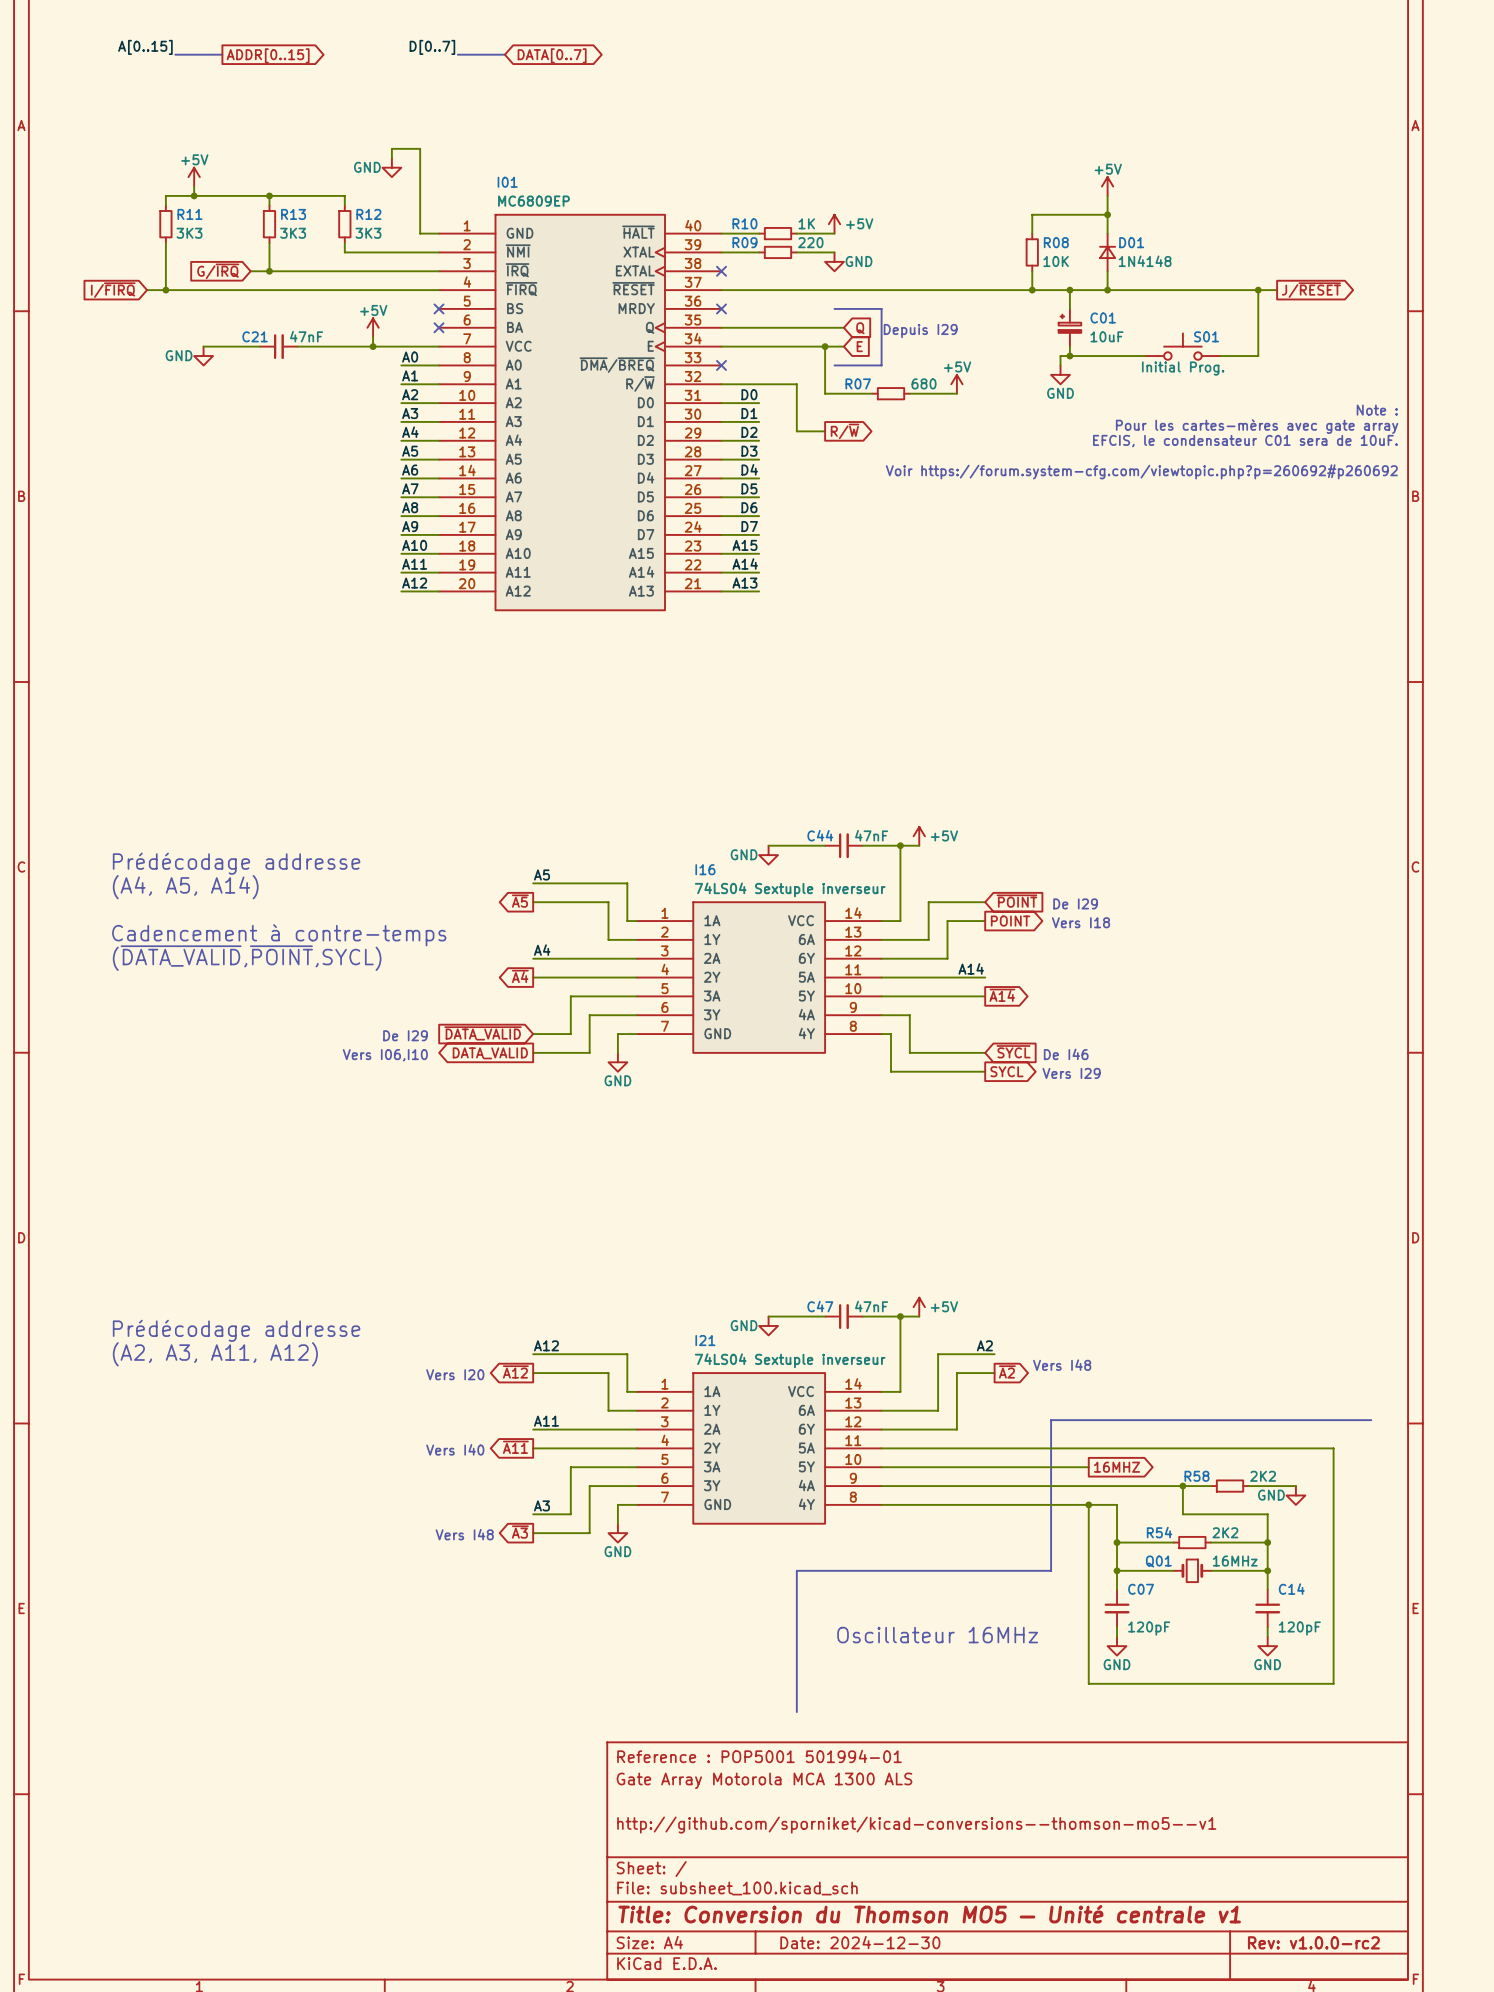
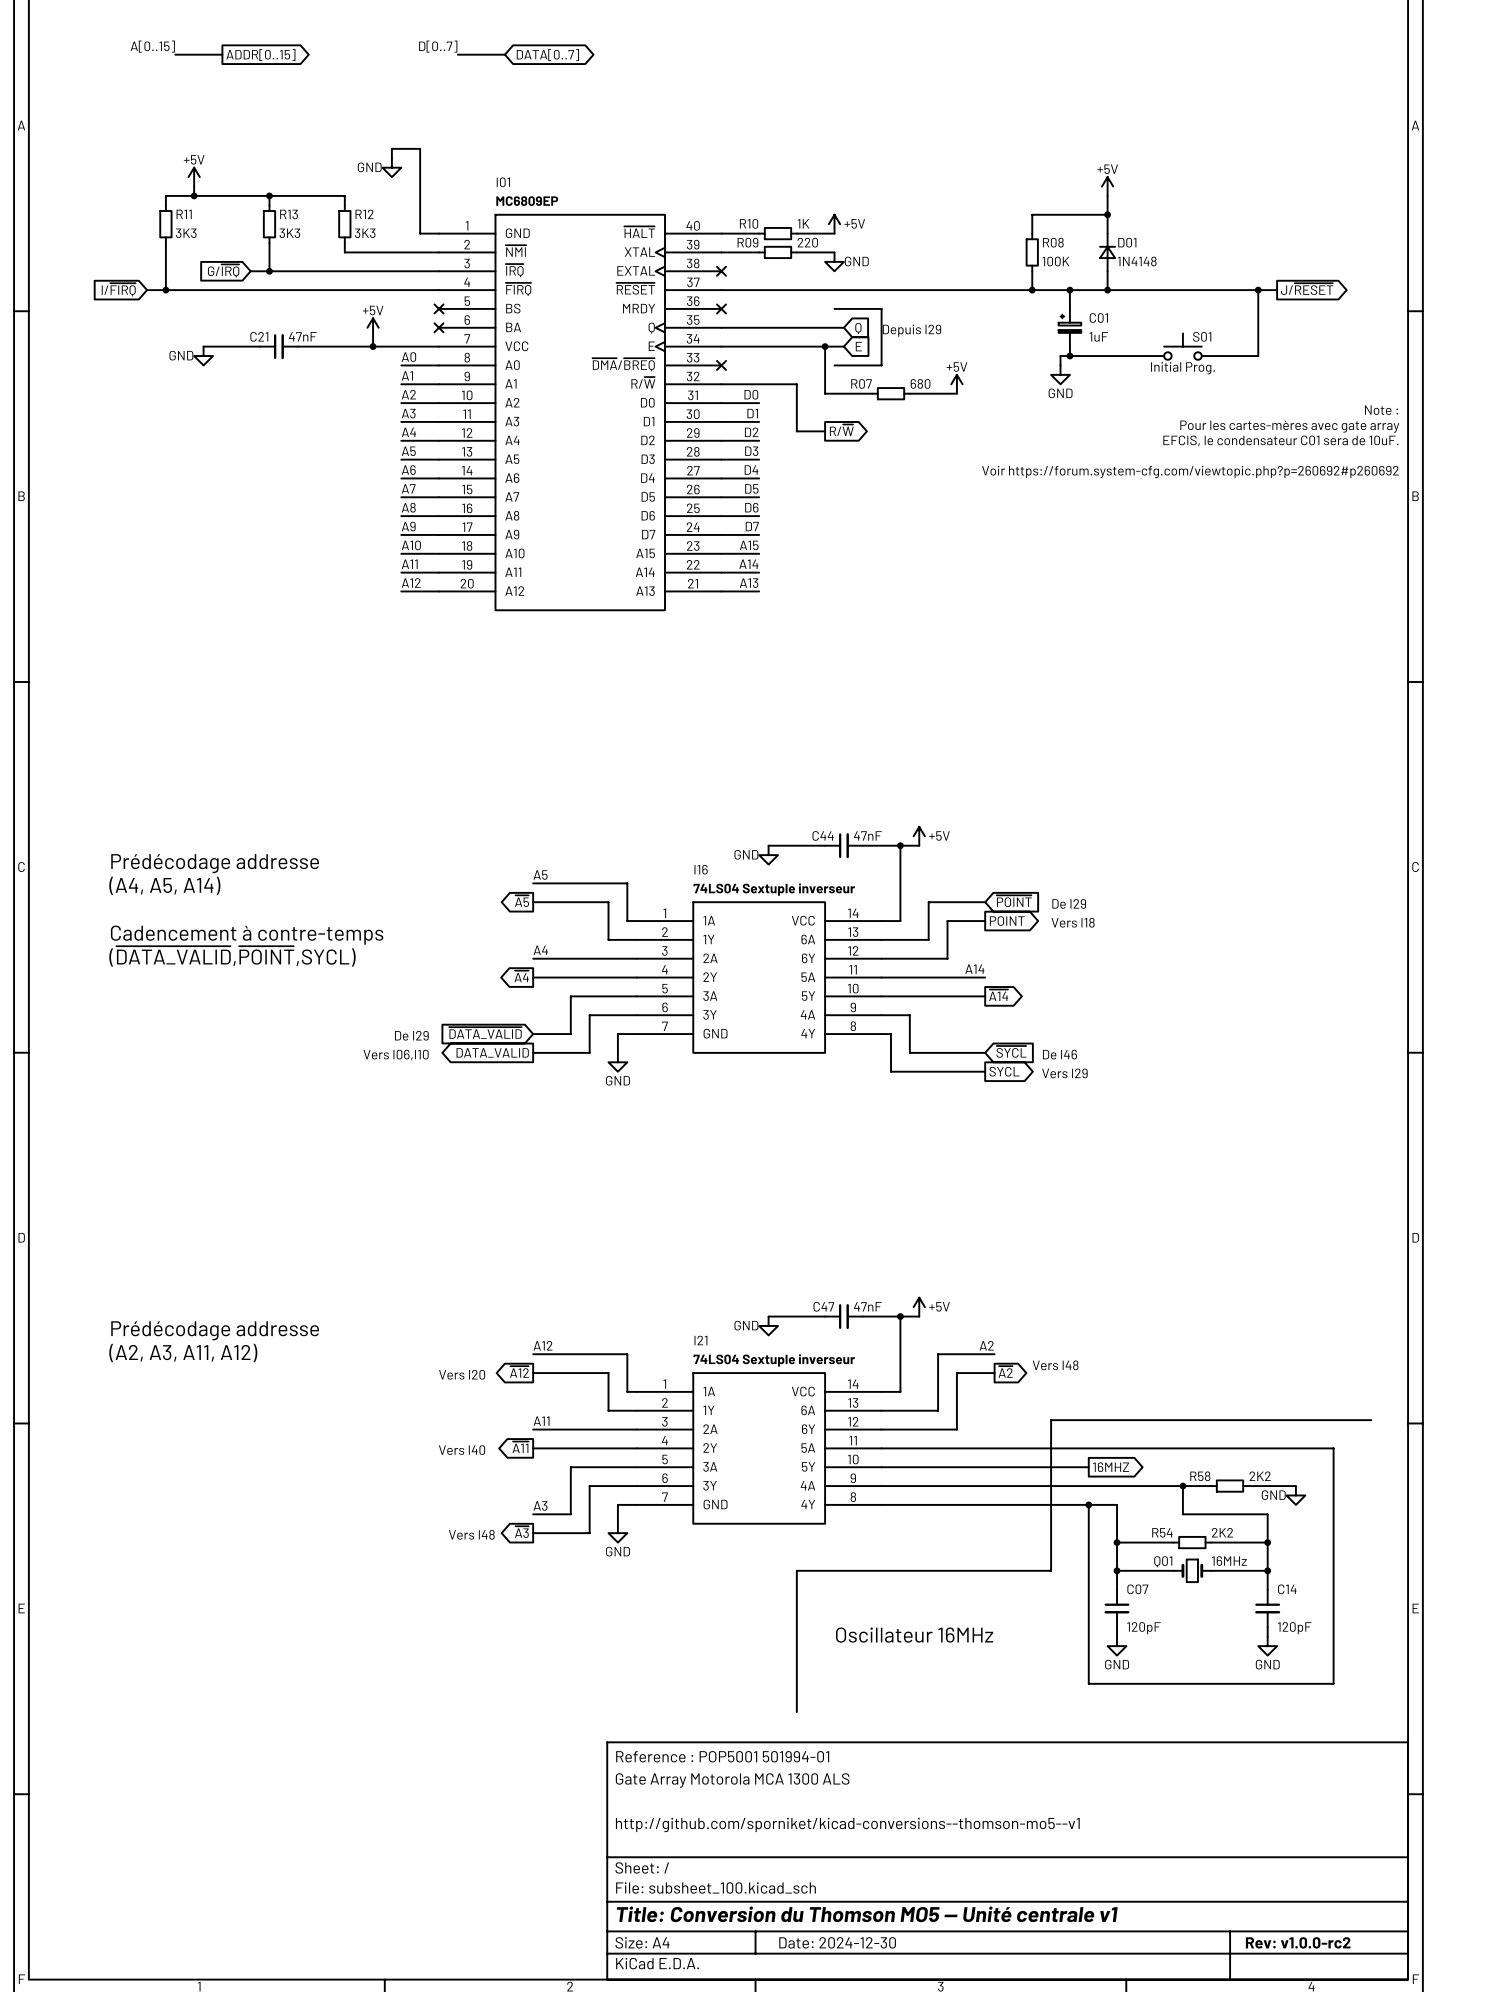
R08 value: 10K (1056, 261) -> 100K (1055, 261)
C01 value: 10uF (1106, 336) -> 1uF (1098, 336)

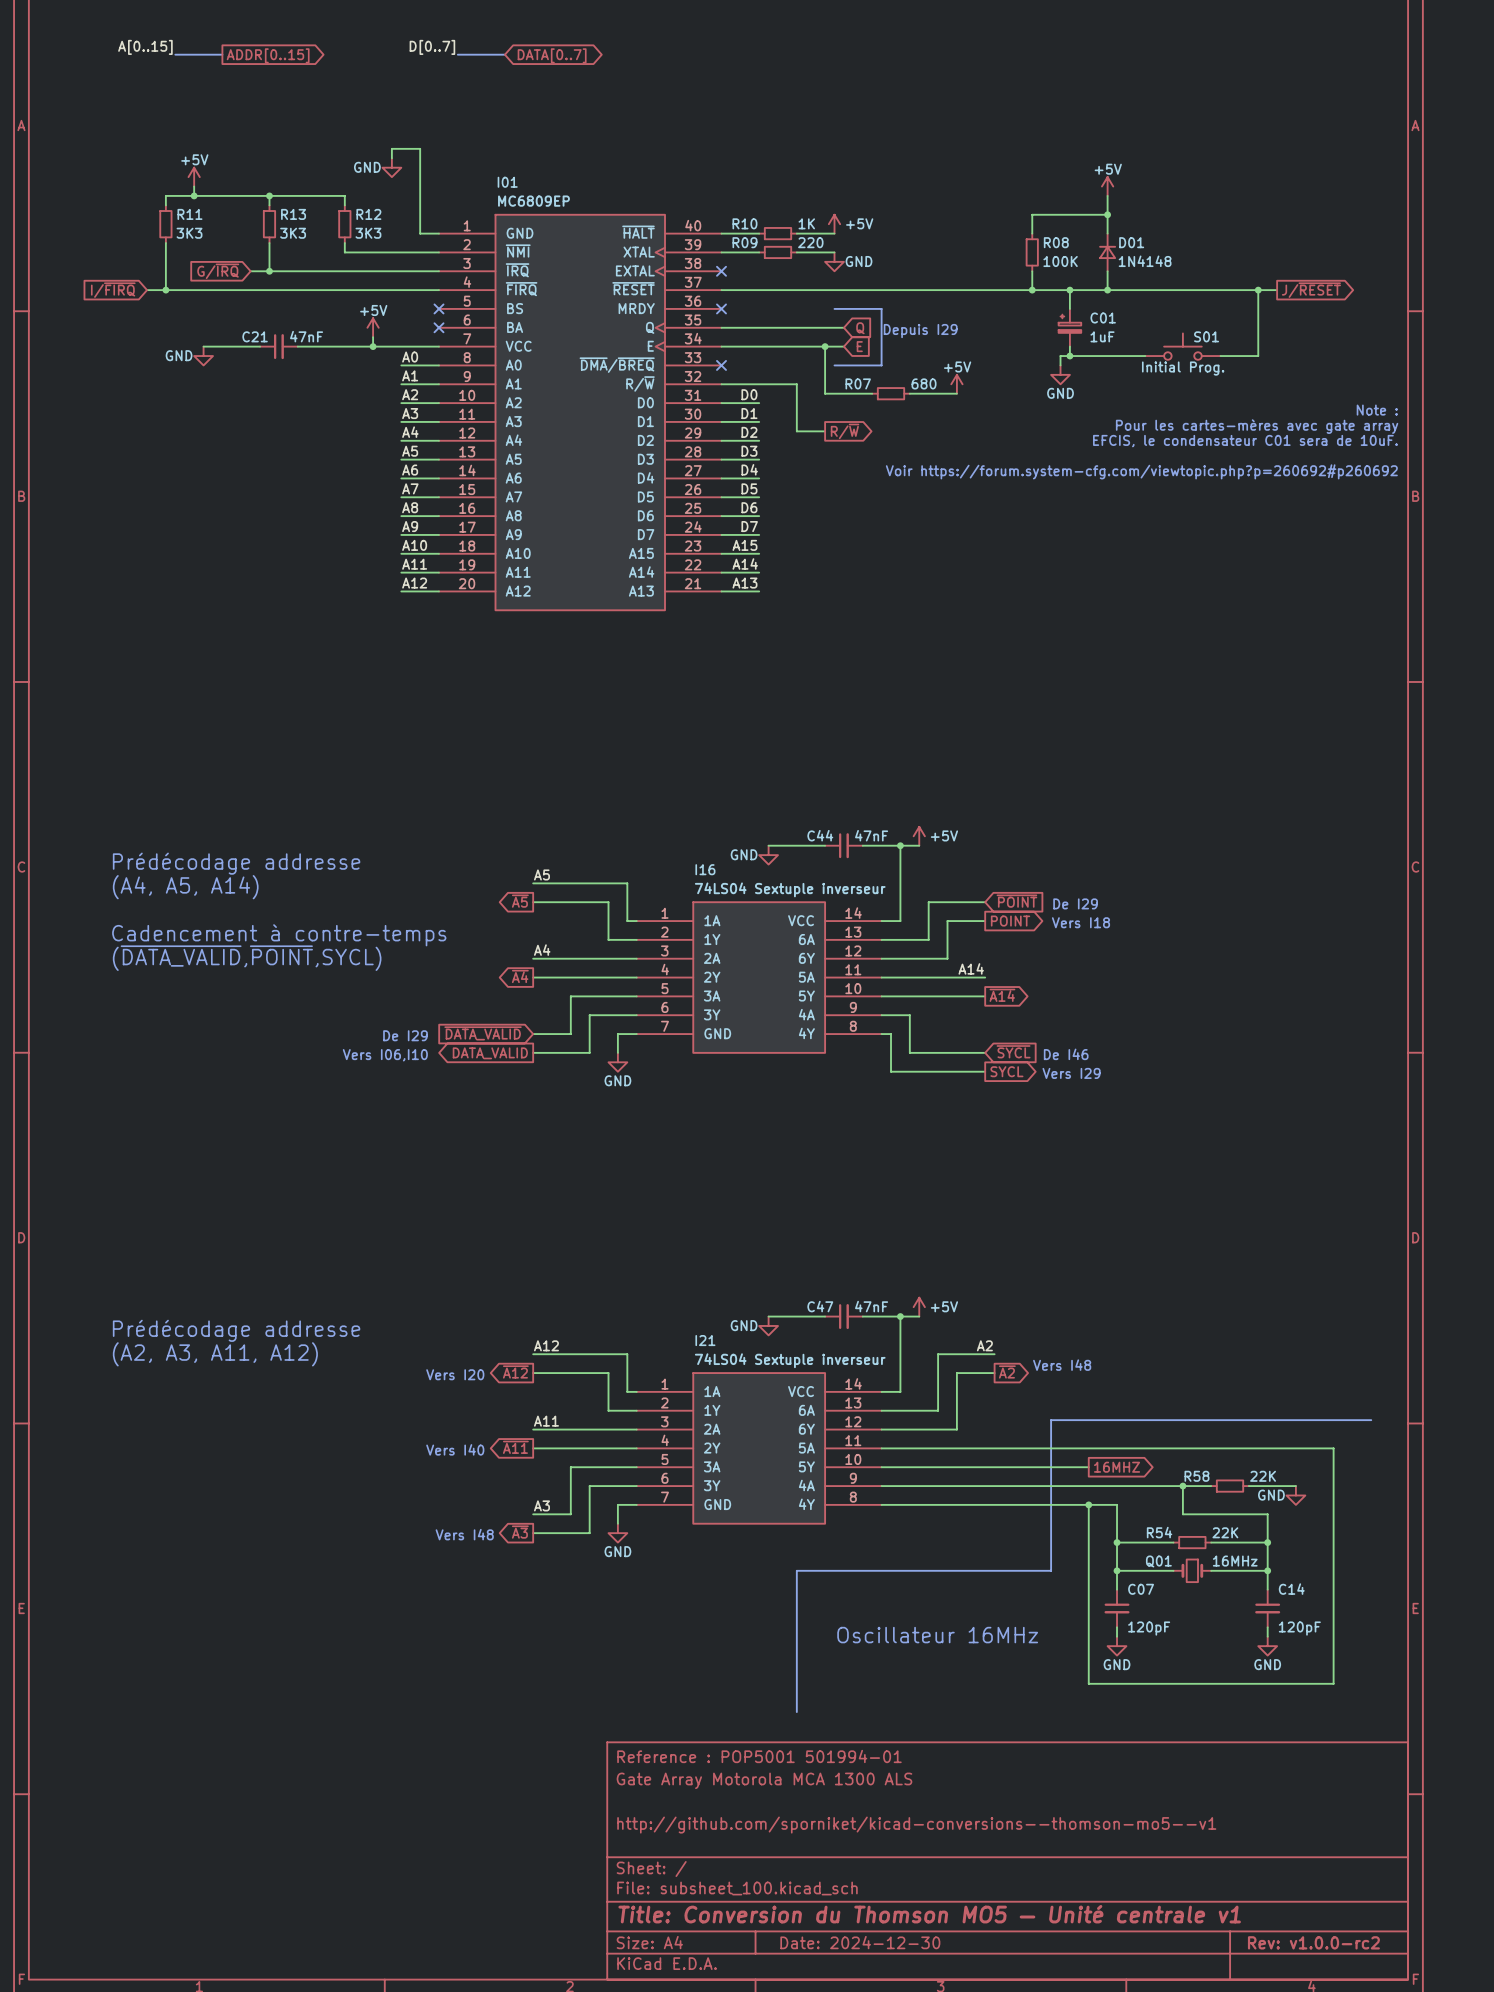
R58 value: 2K2 (1260, 1476) -> 22K (1263, 1476)
R54 value: 2K2 (1222, 1532) -> 22K (1225, 1532)

